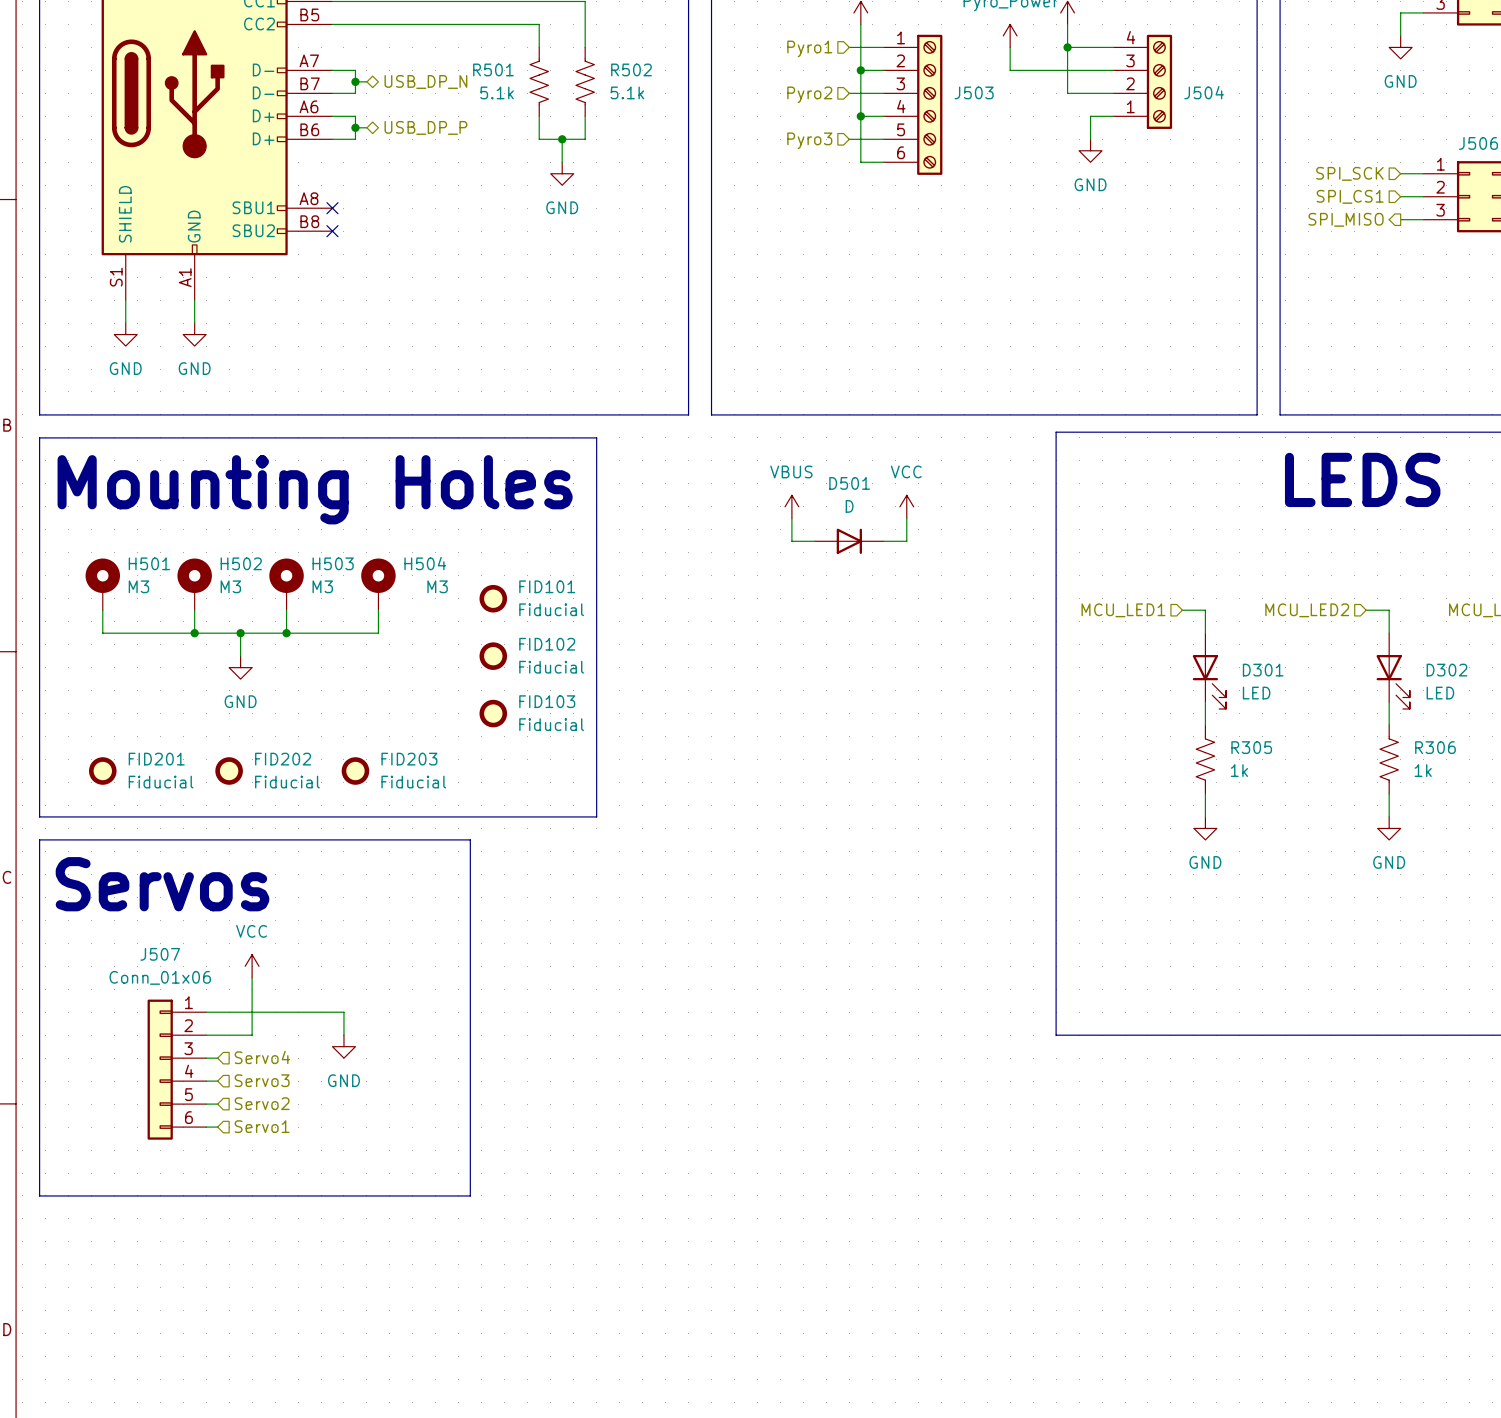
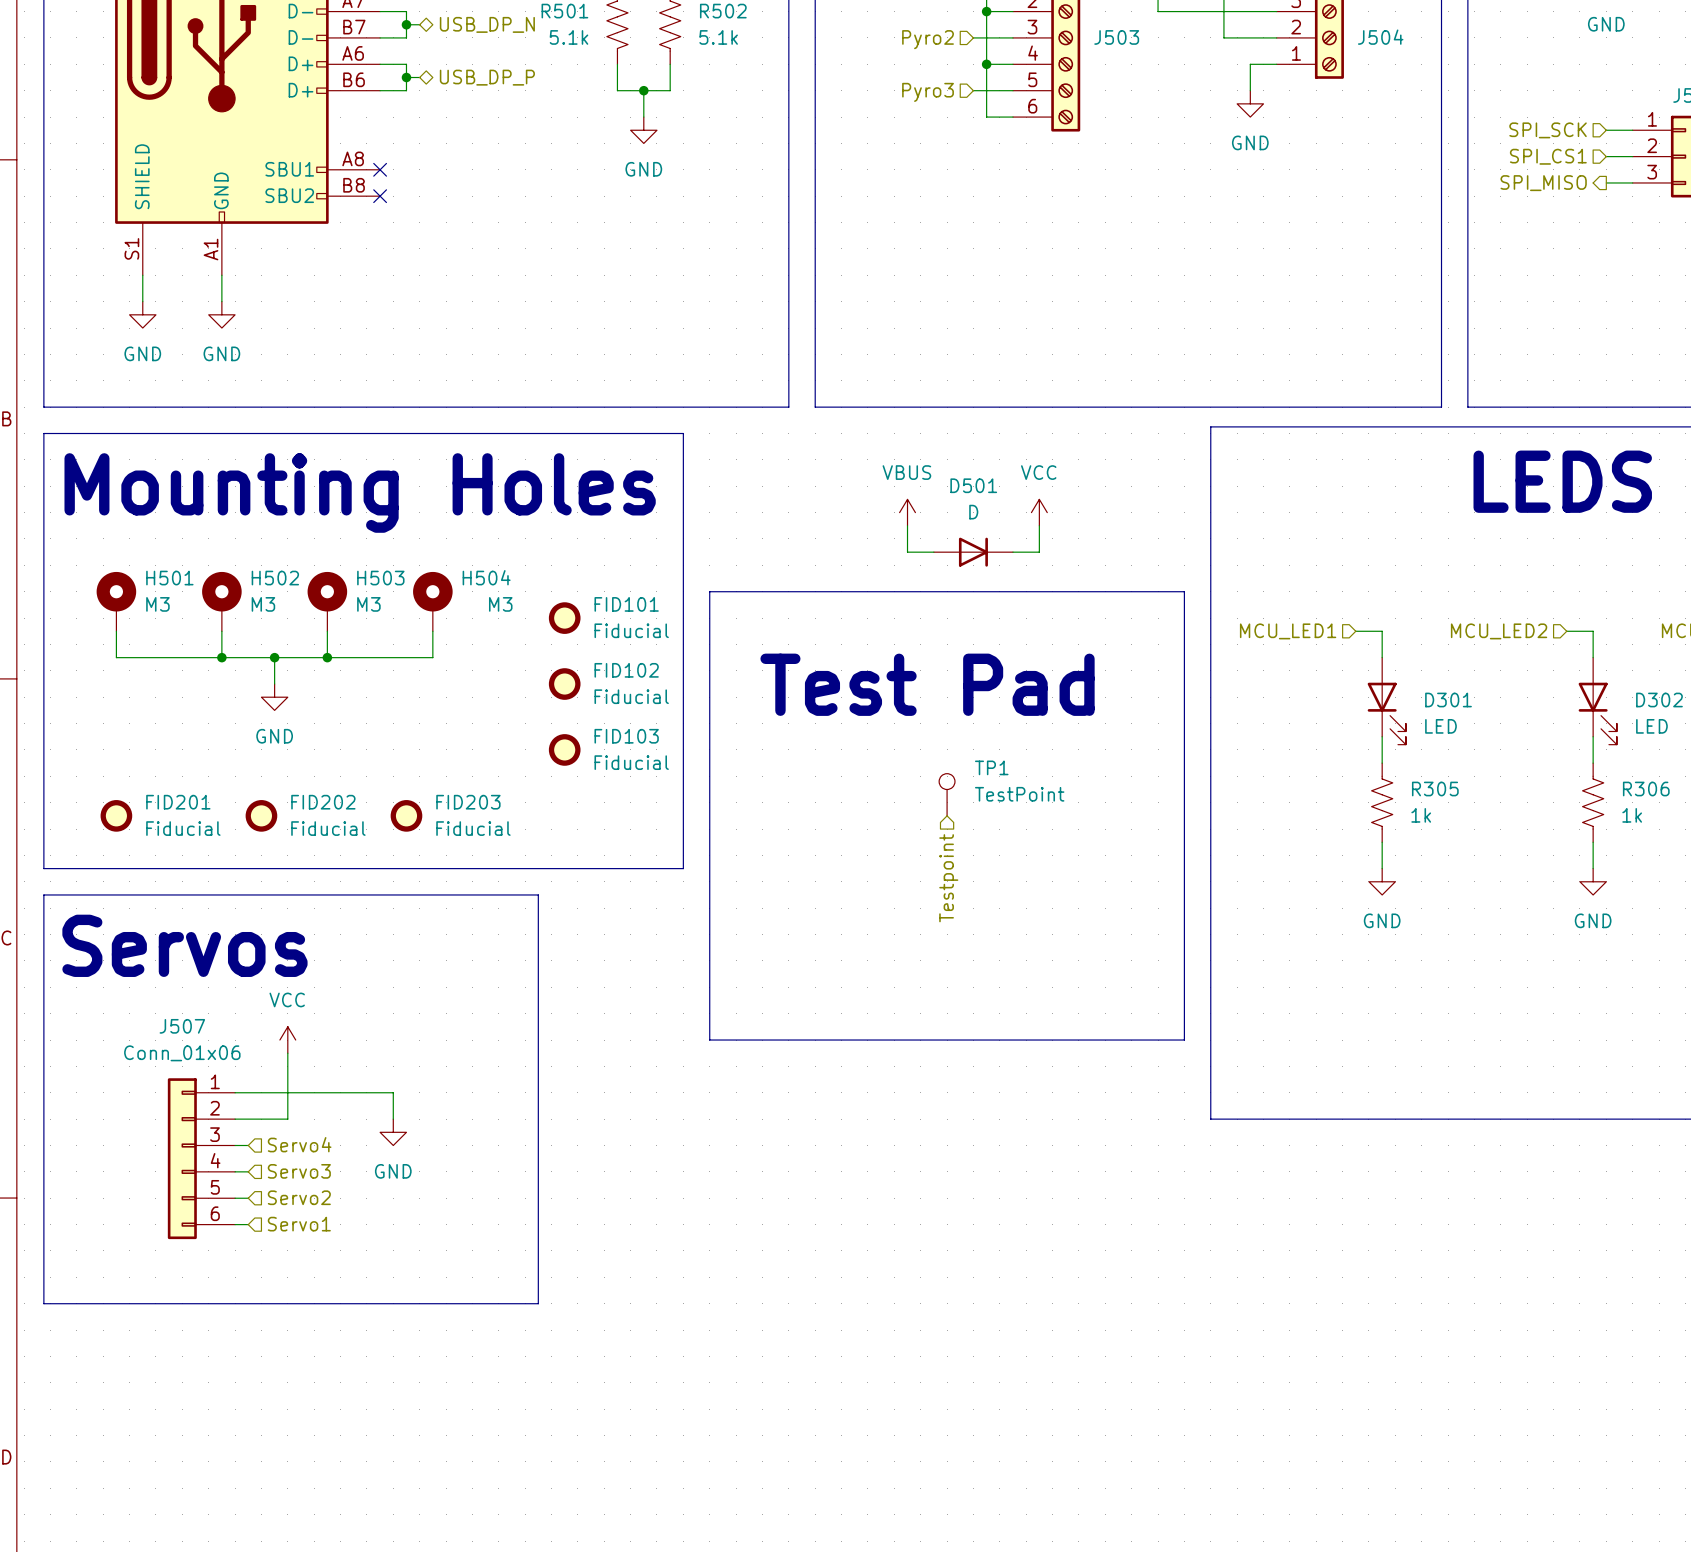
line: none -> (709, 591) (1184, 591) (1184, 1040) (709, 1040) (709, 591)
text: none -> Test Pad (927, 684)
TP1: none -> TestPoint (947, 794)
hierarchical label: none -> Testpoint (948, 878)

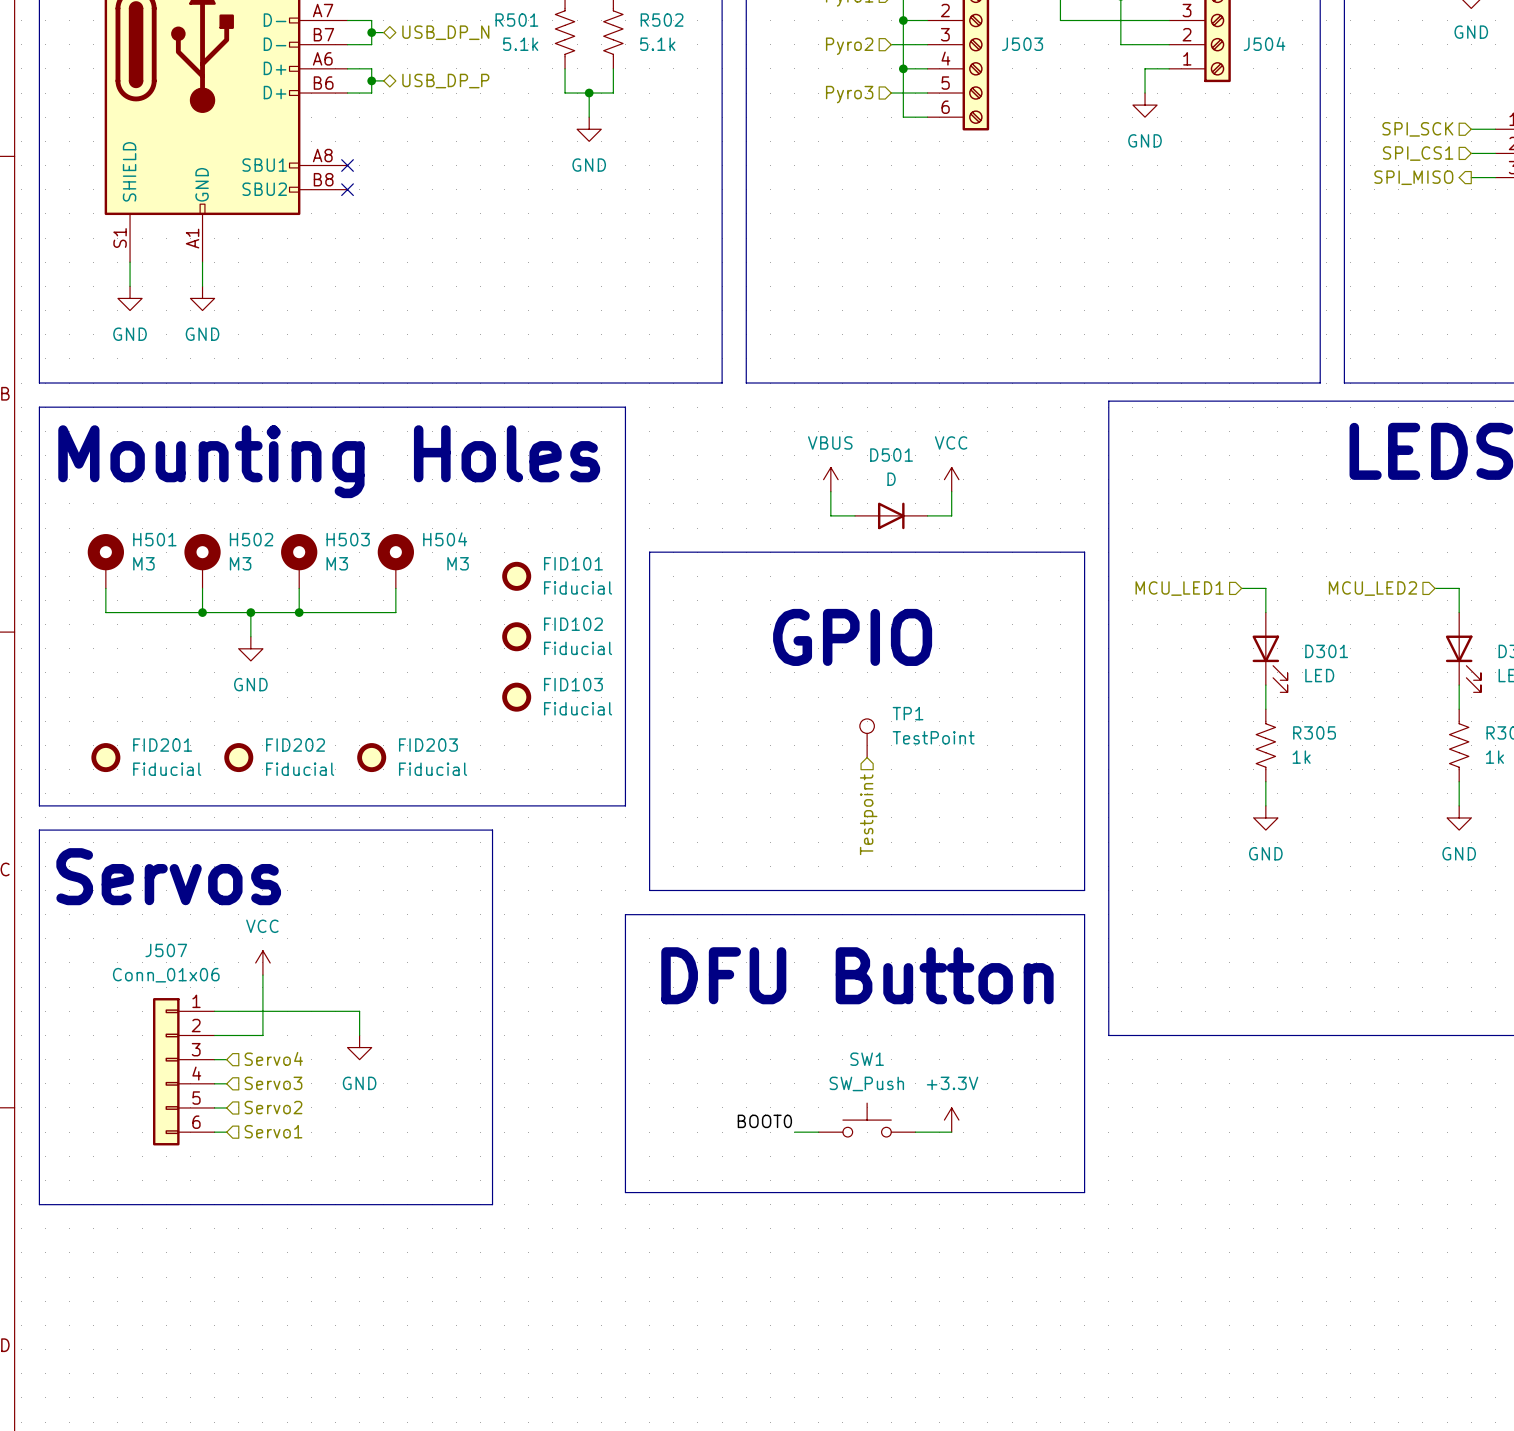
text: Test Pad (927, 684) -> GPIO (852, 637)
line: (709, 960) (709, 1040) (1184, 1040) -> (649, 890) (1084, 890)
line: (1184, 960) (1184, 987) -> (1084, 962) (1084, 1192) (625, 1192) (625, 914) (1084, 914)
text: none -> DFU Button (857, 975)
SW1: none -> SW_Push (867, 1120)
power symbol: none -> +3.3V (951, 1120)
label: none -> BOOT0 (764, 1121)
wire: none -> (794, 1132) (818, 1132)
wire: none -> (915, 1132) (951, 1132)

